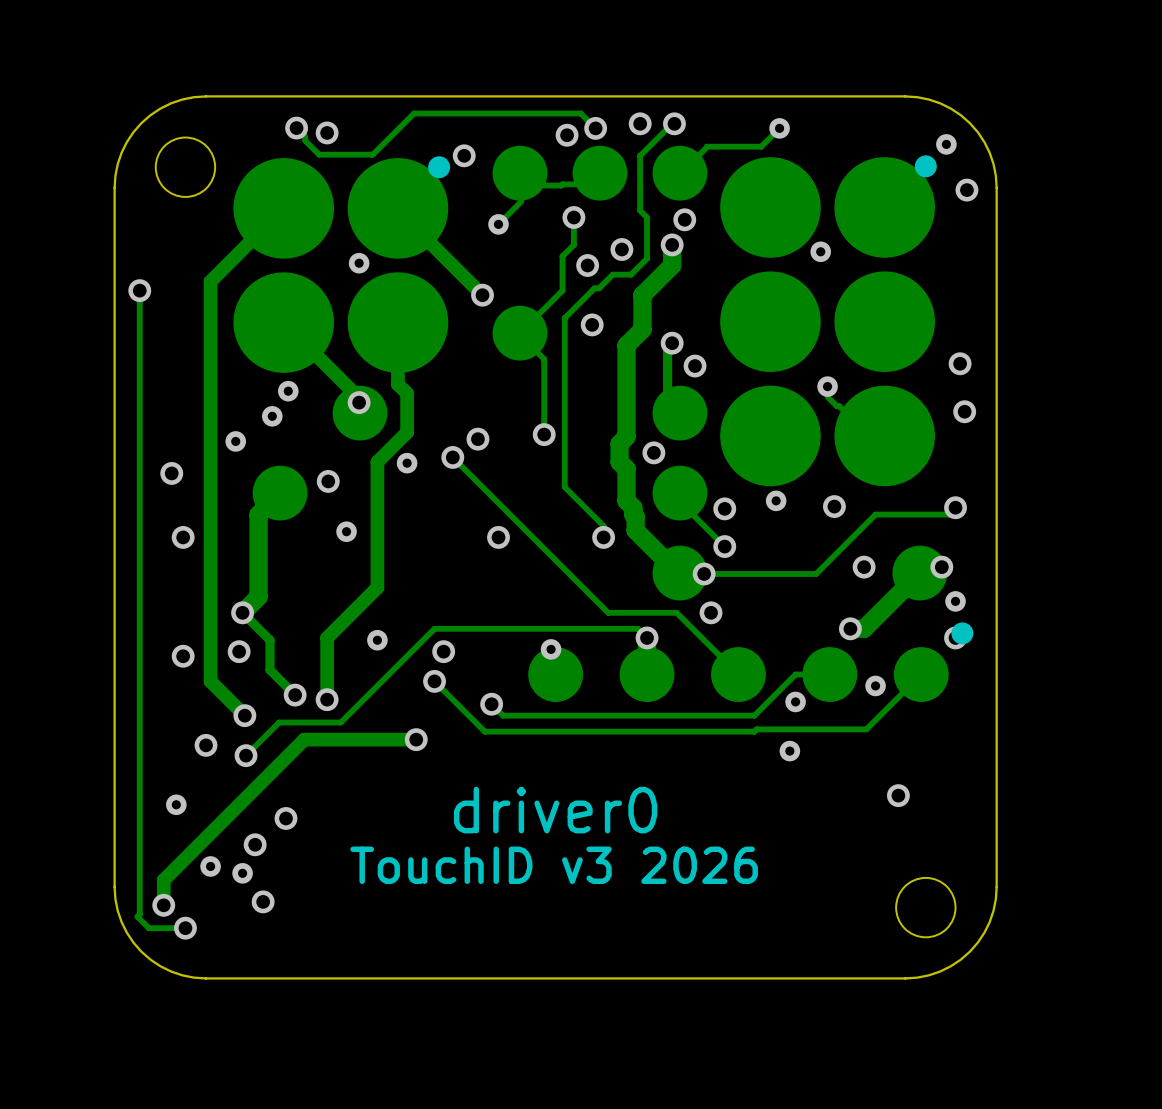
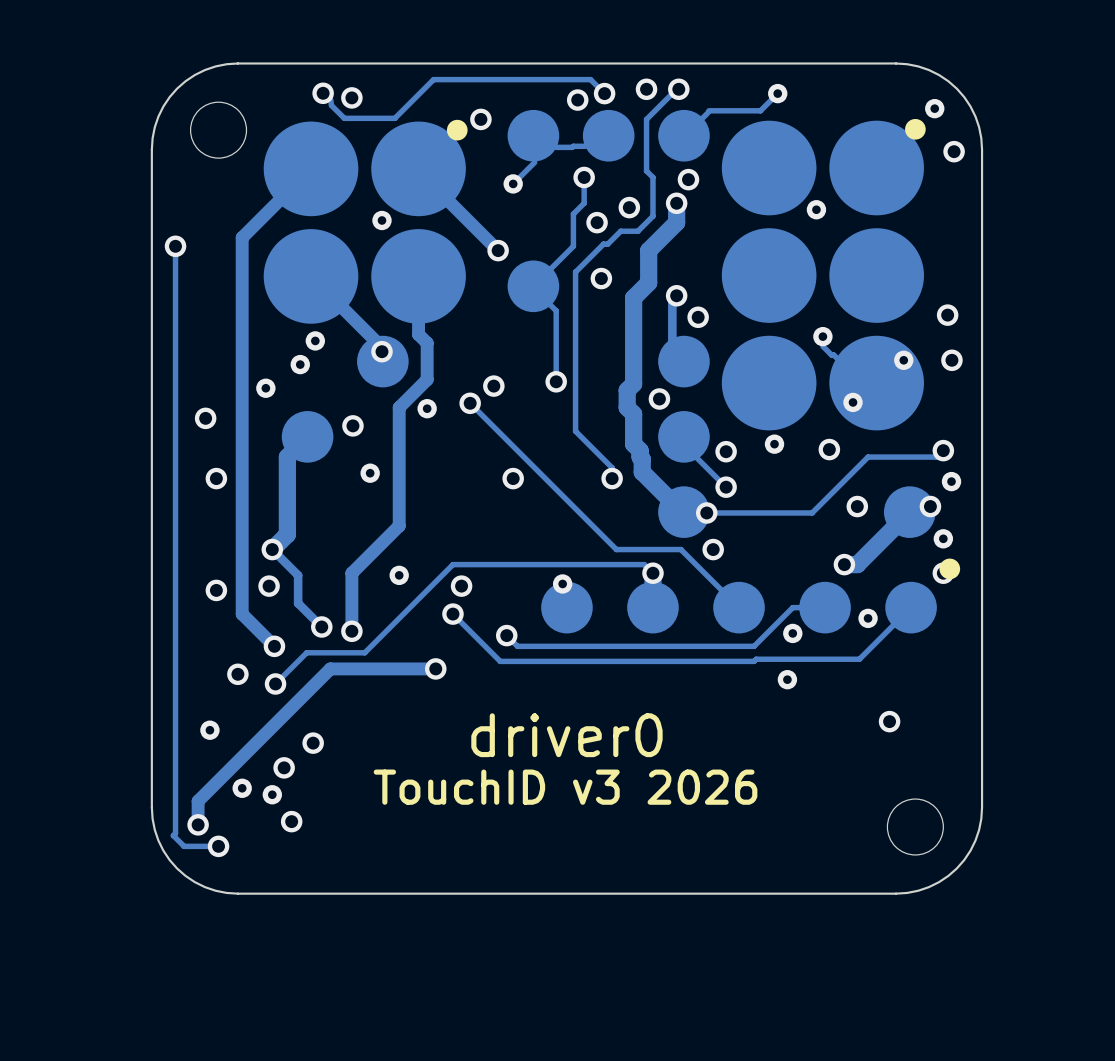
via: none -> (903, 360)
via: none -> (853, 402)
via: none -> (951, 481)

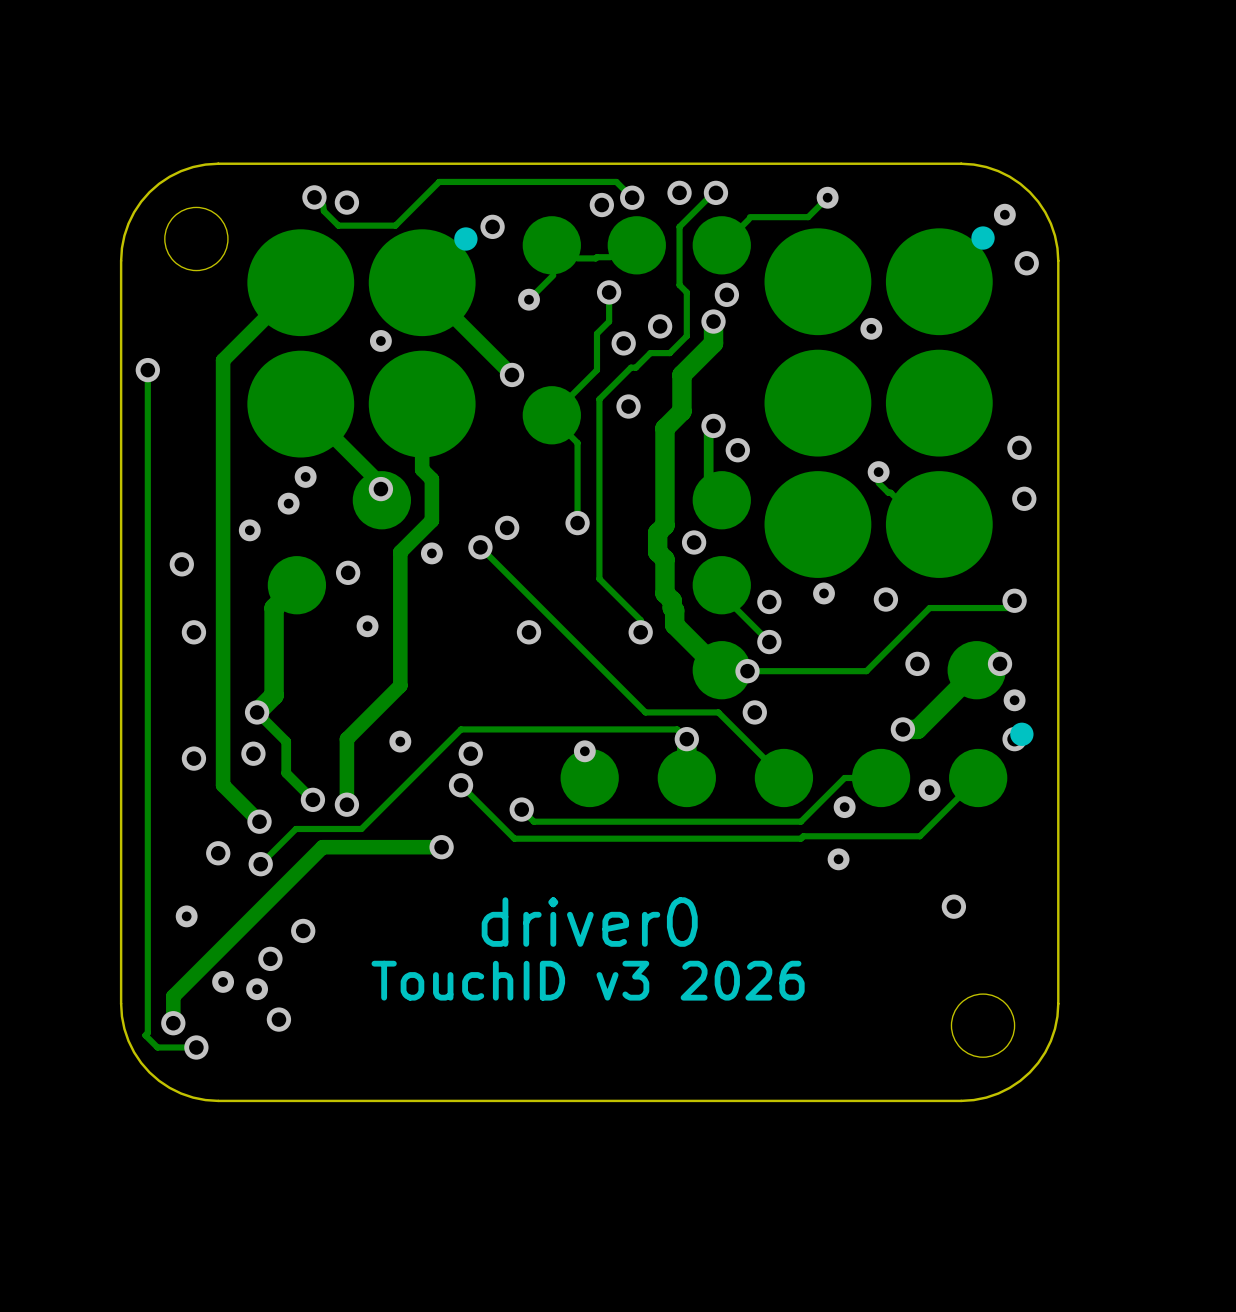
via: (903, 360) -> none
via: (853, 402) -> none
via: (951, 481) -> none

